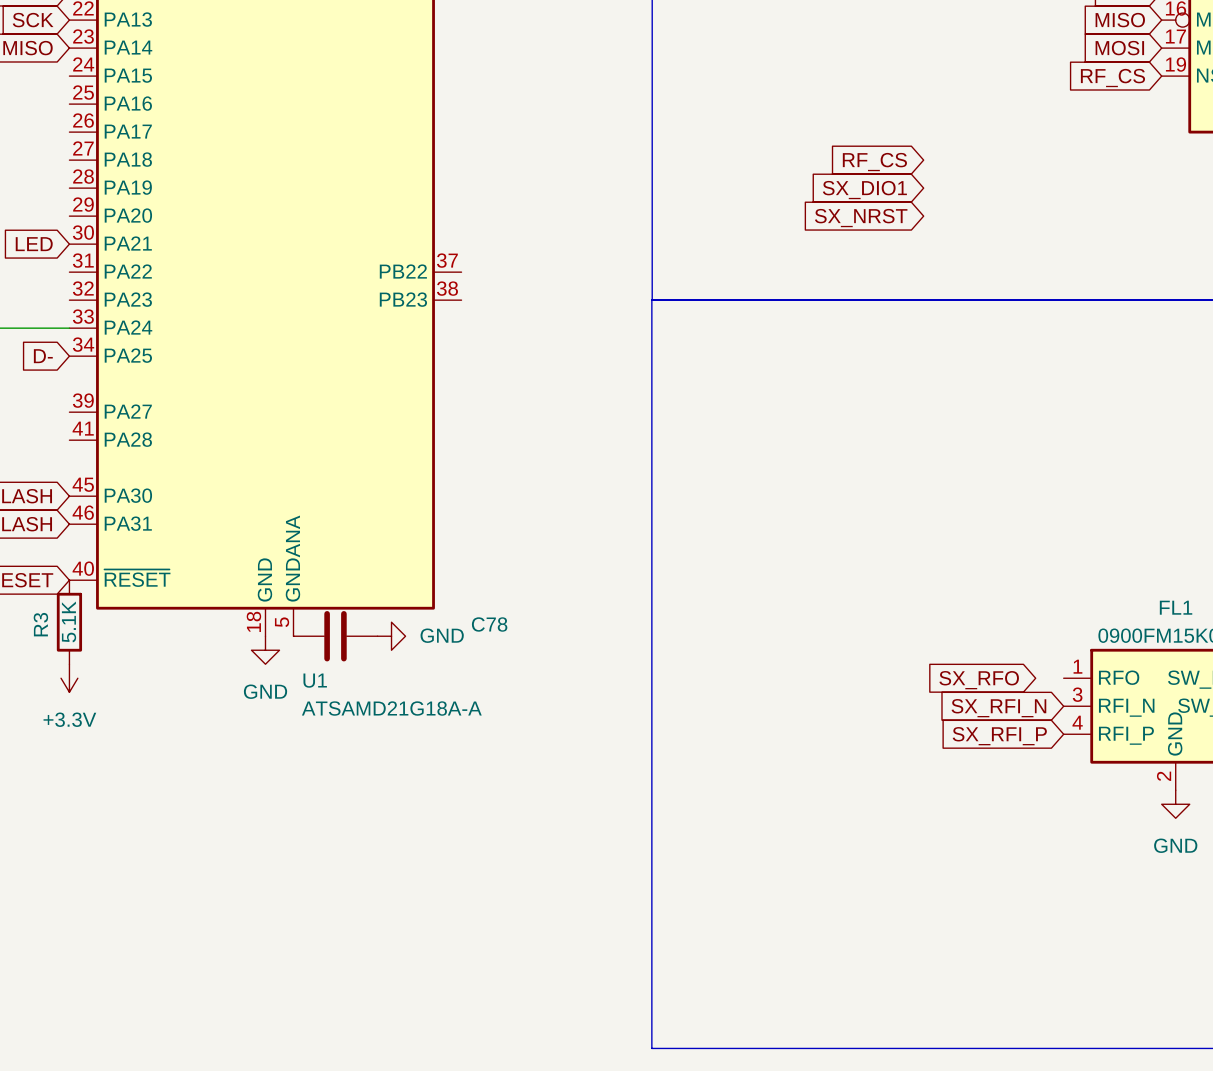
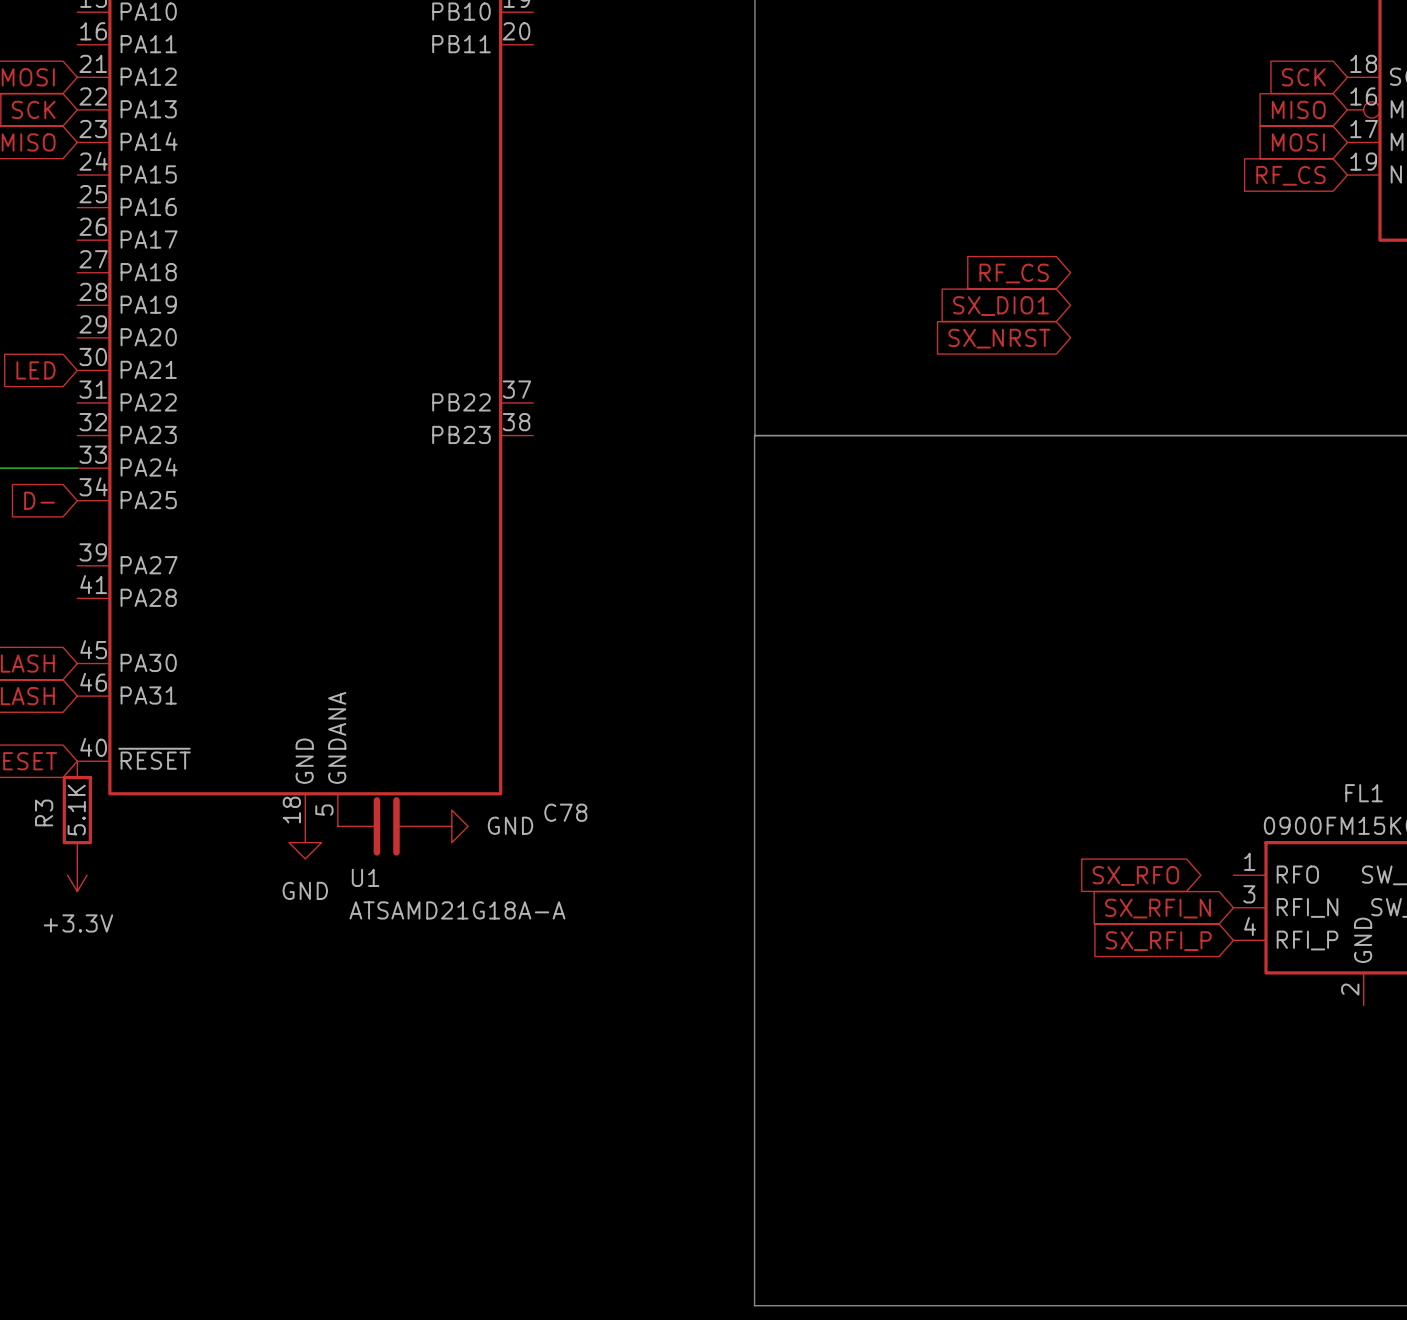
power symbol: GND (1175, 804) -> none

